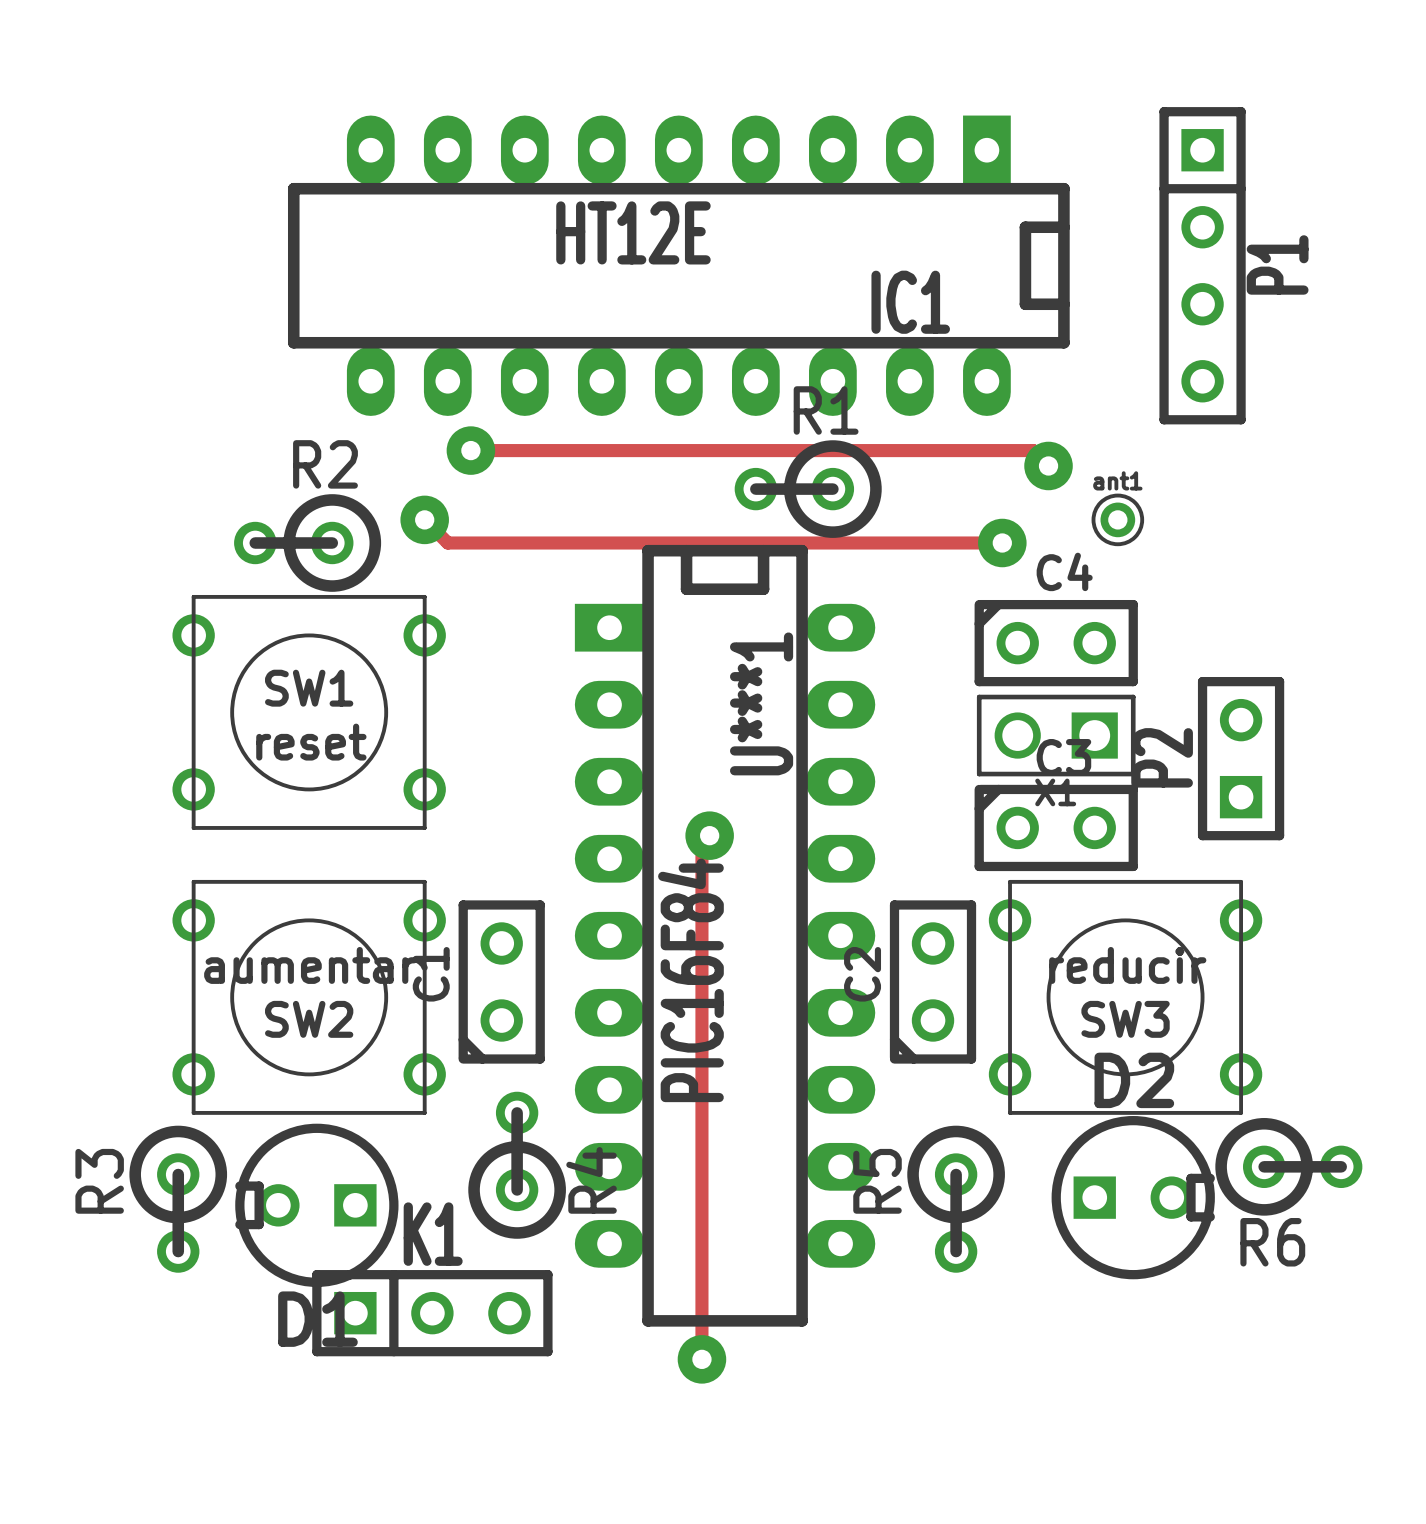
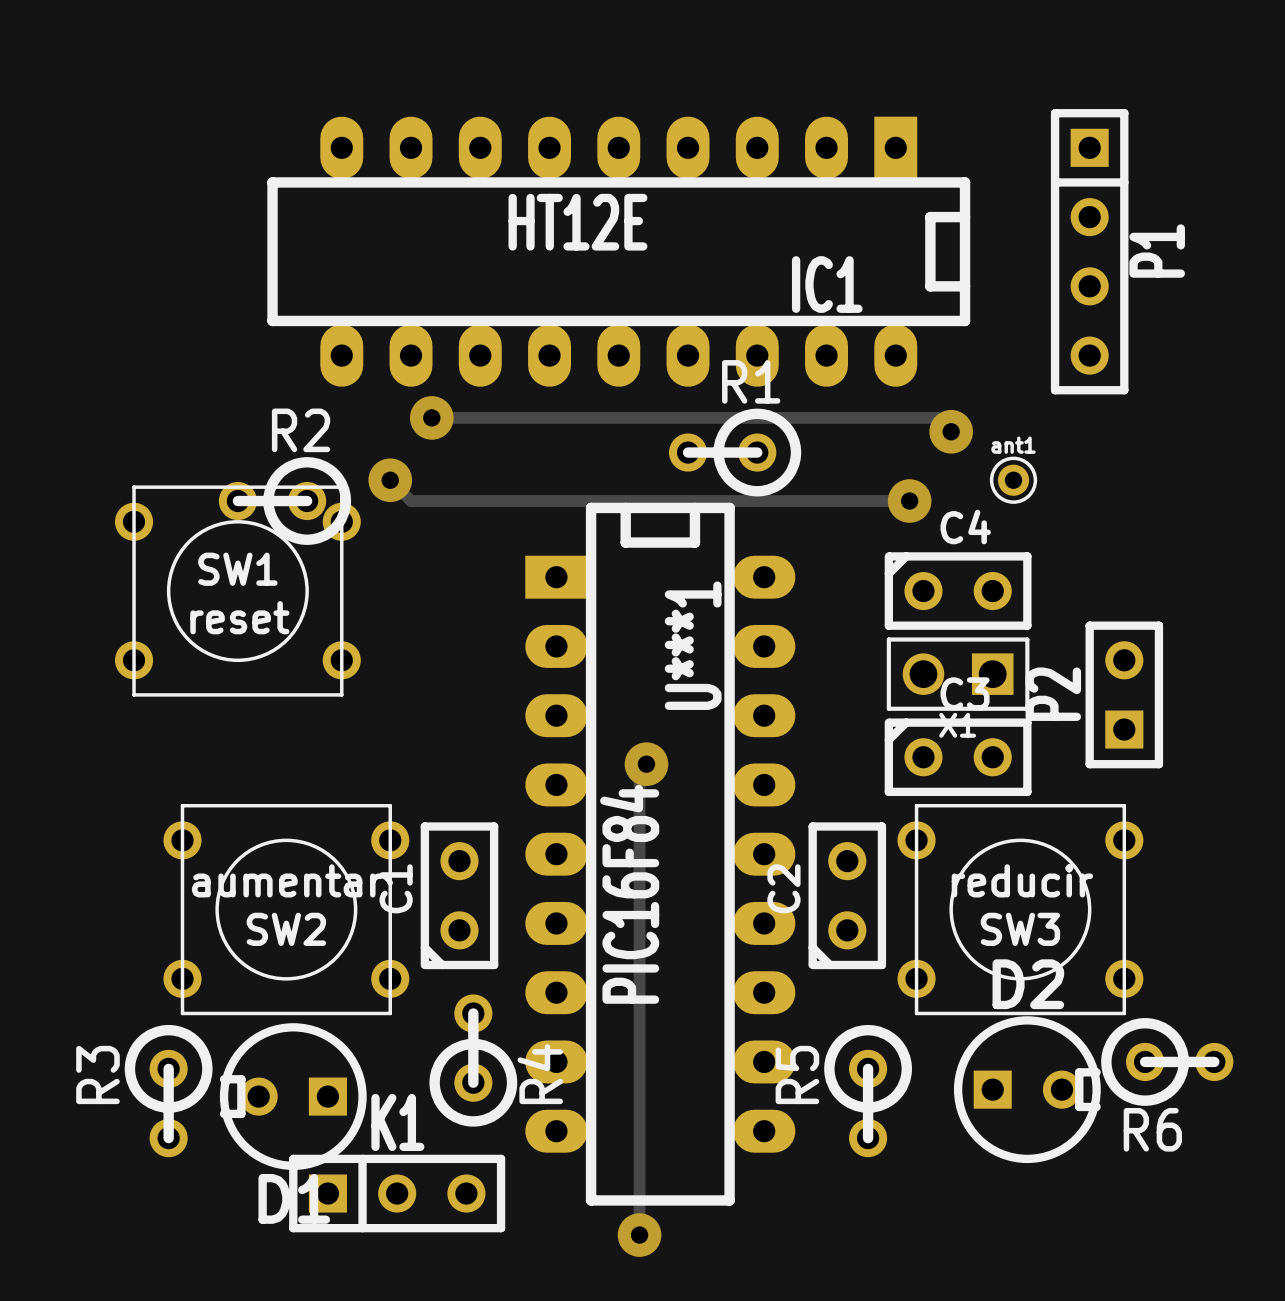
SW1 position: (309, 712) -> (237, 591)

